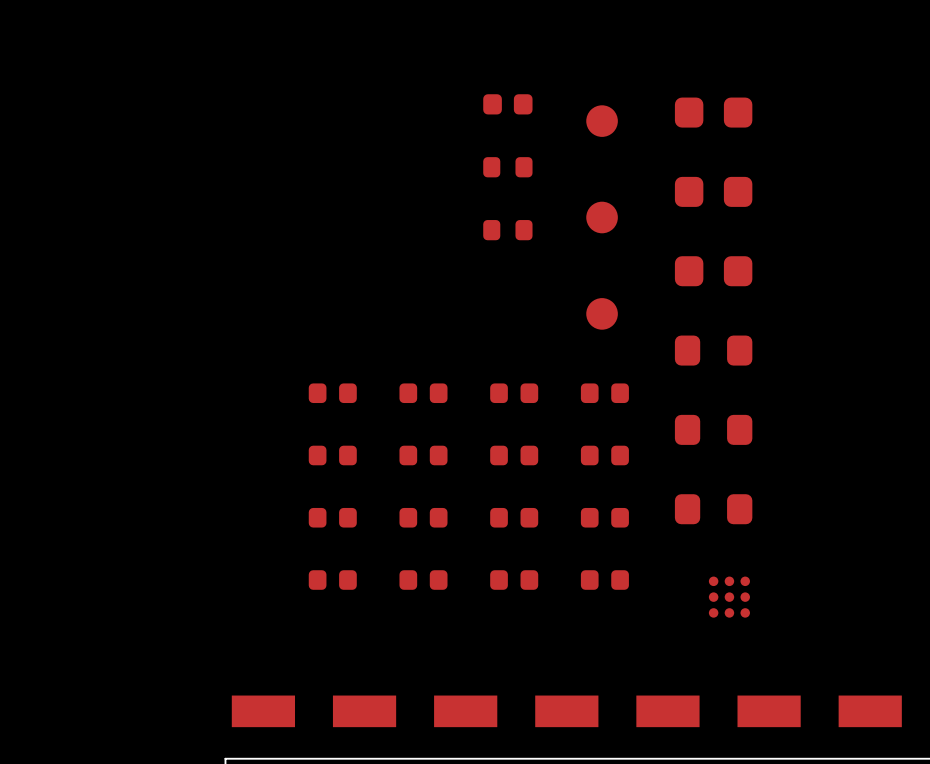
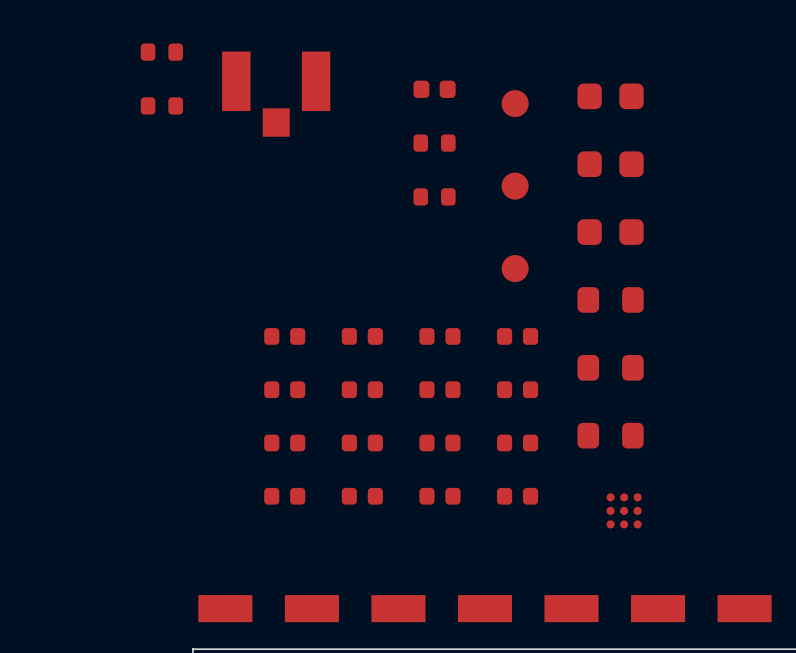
part: none -> (161, 52)
part: none -> (276, 94)
part: none -> (161, 105)

